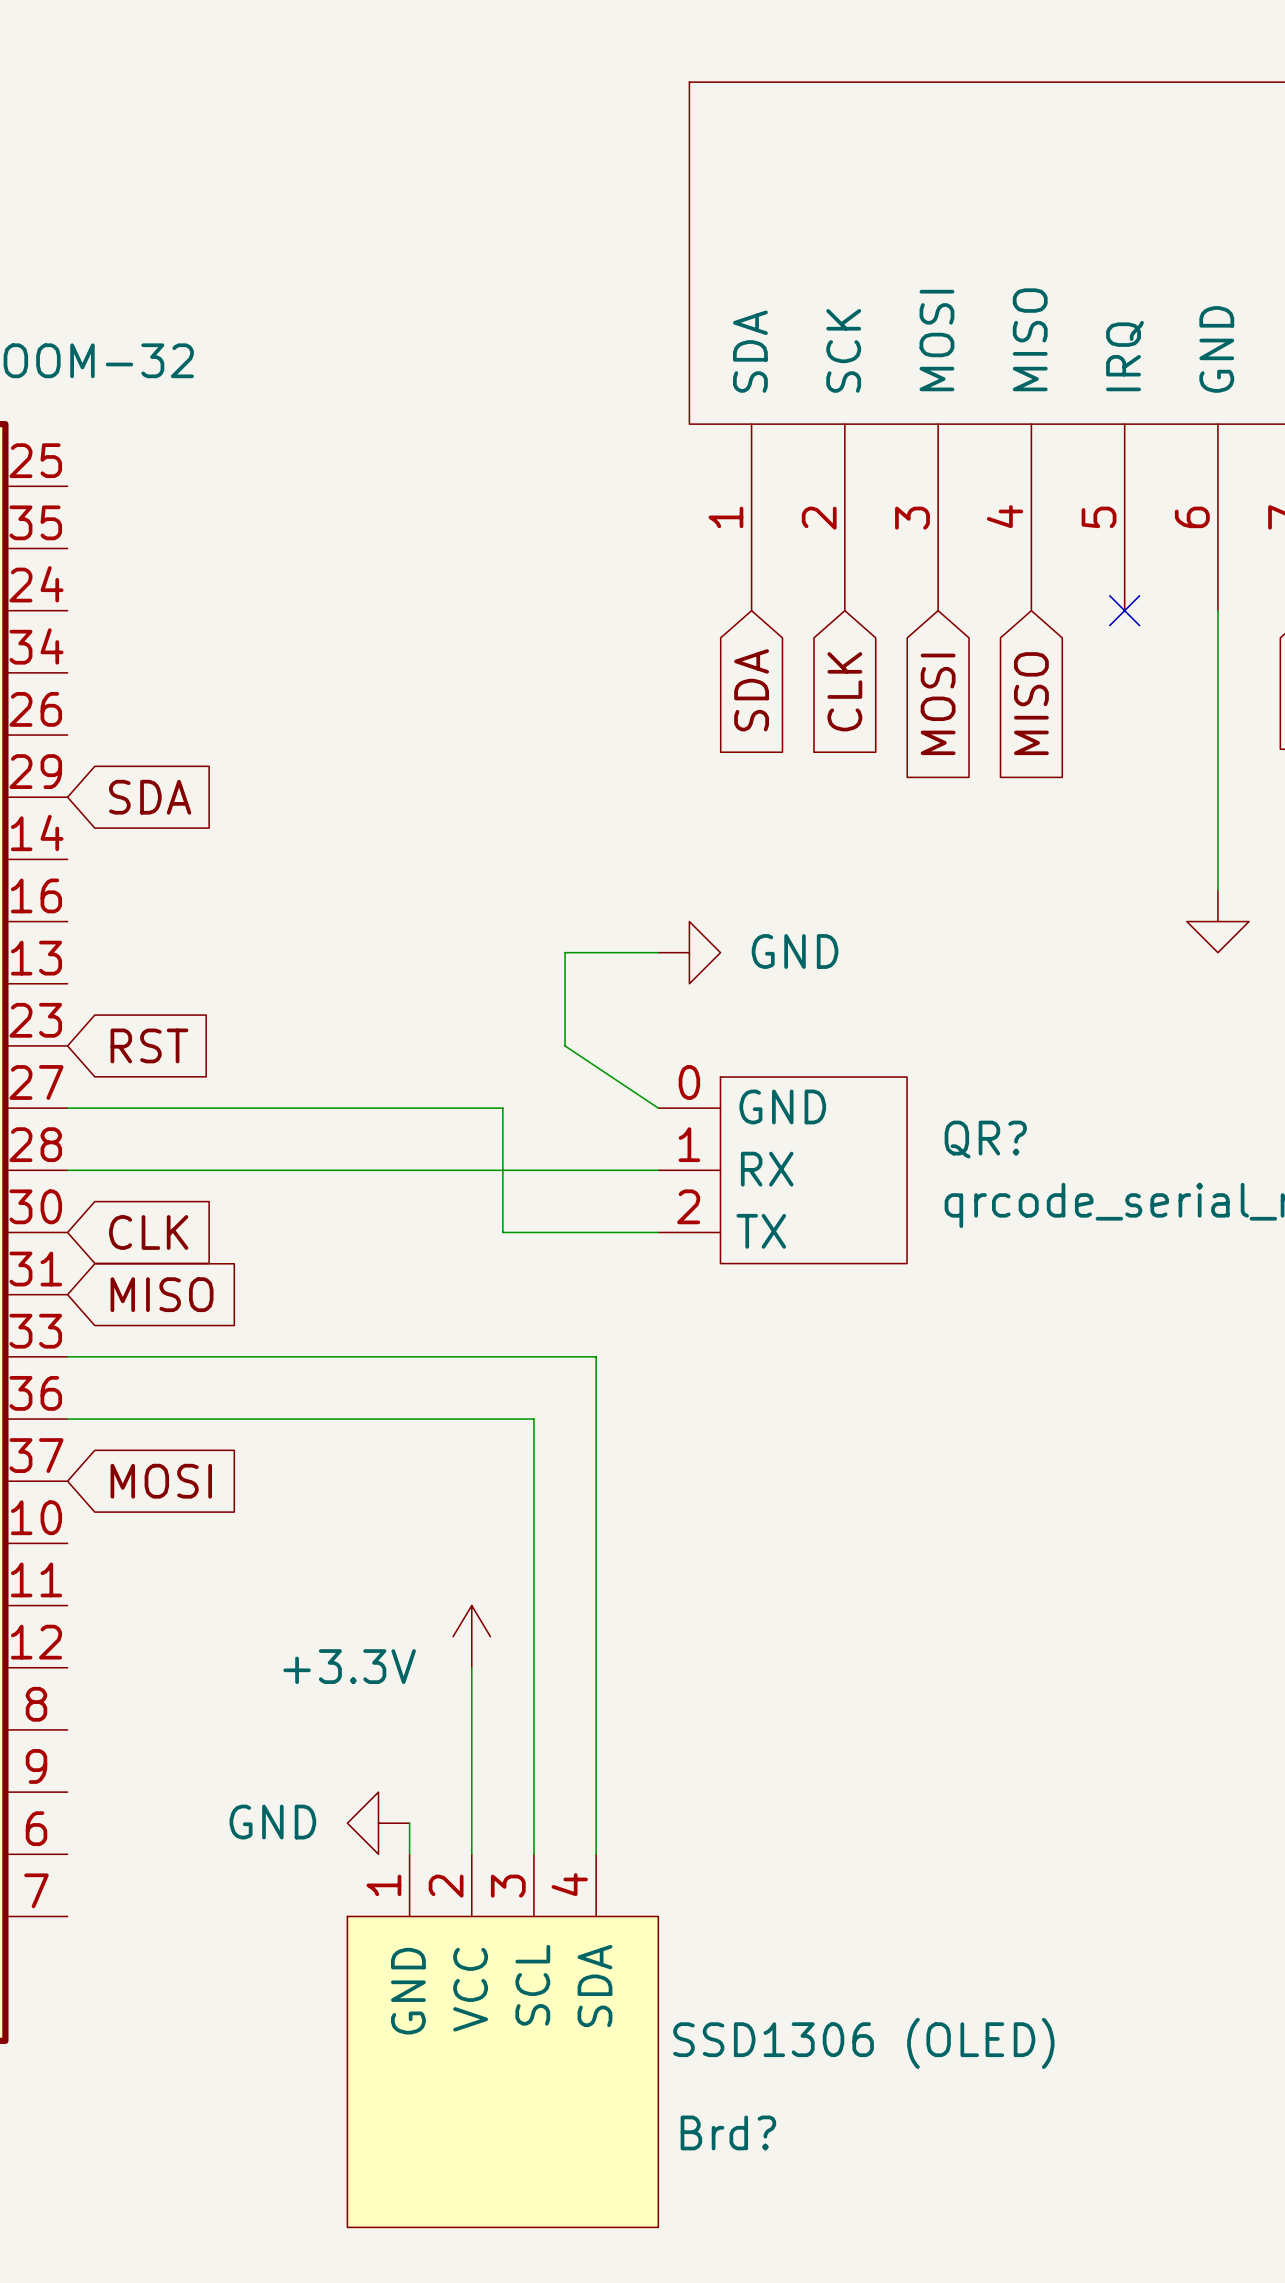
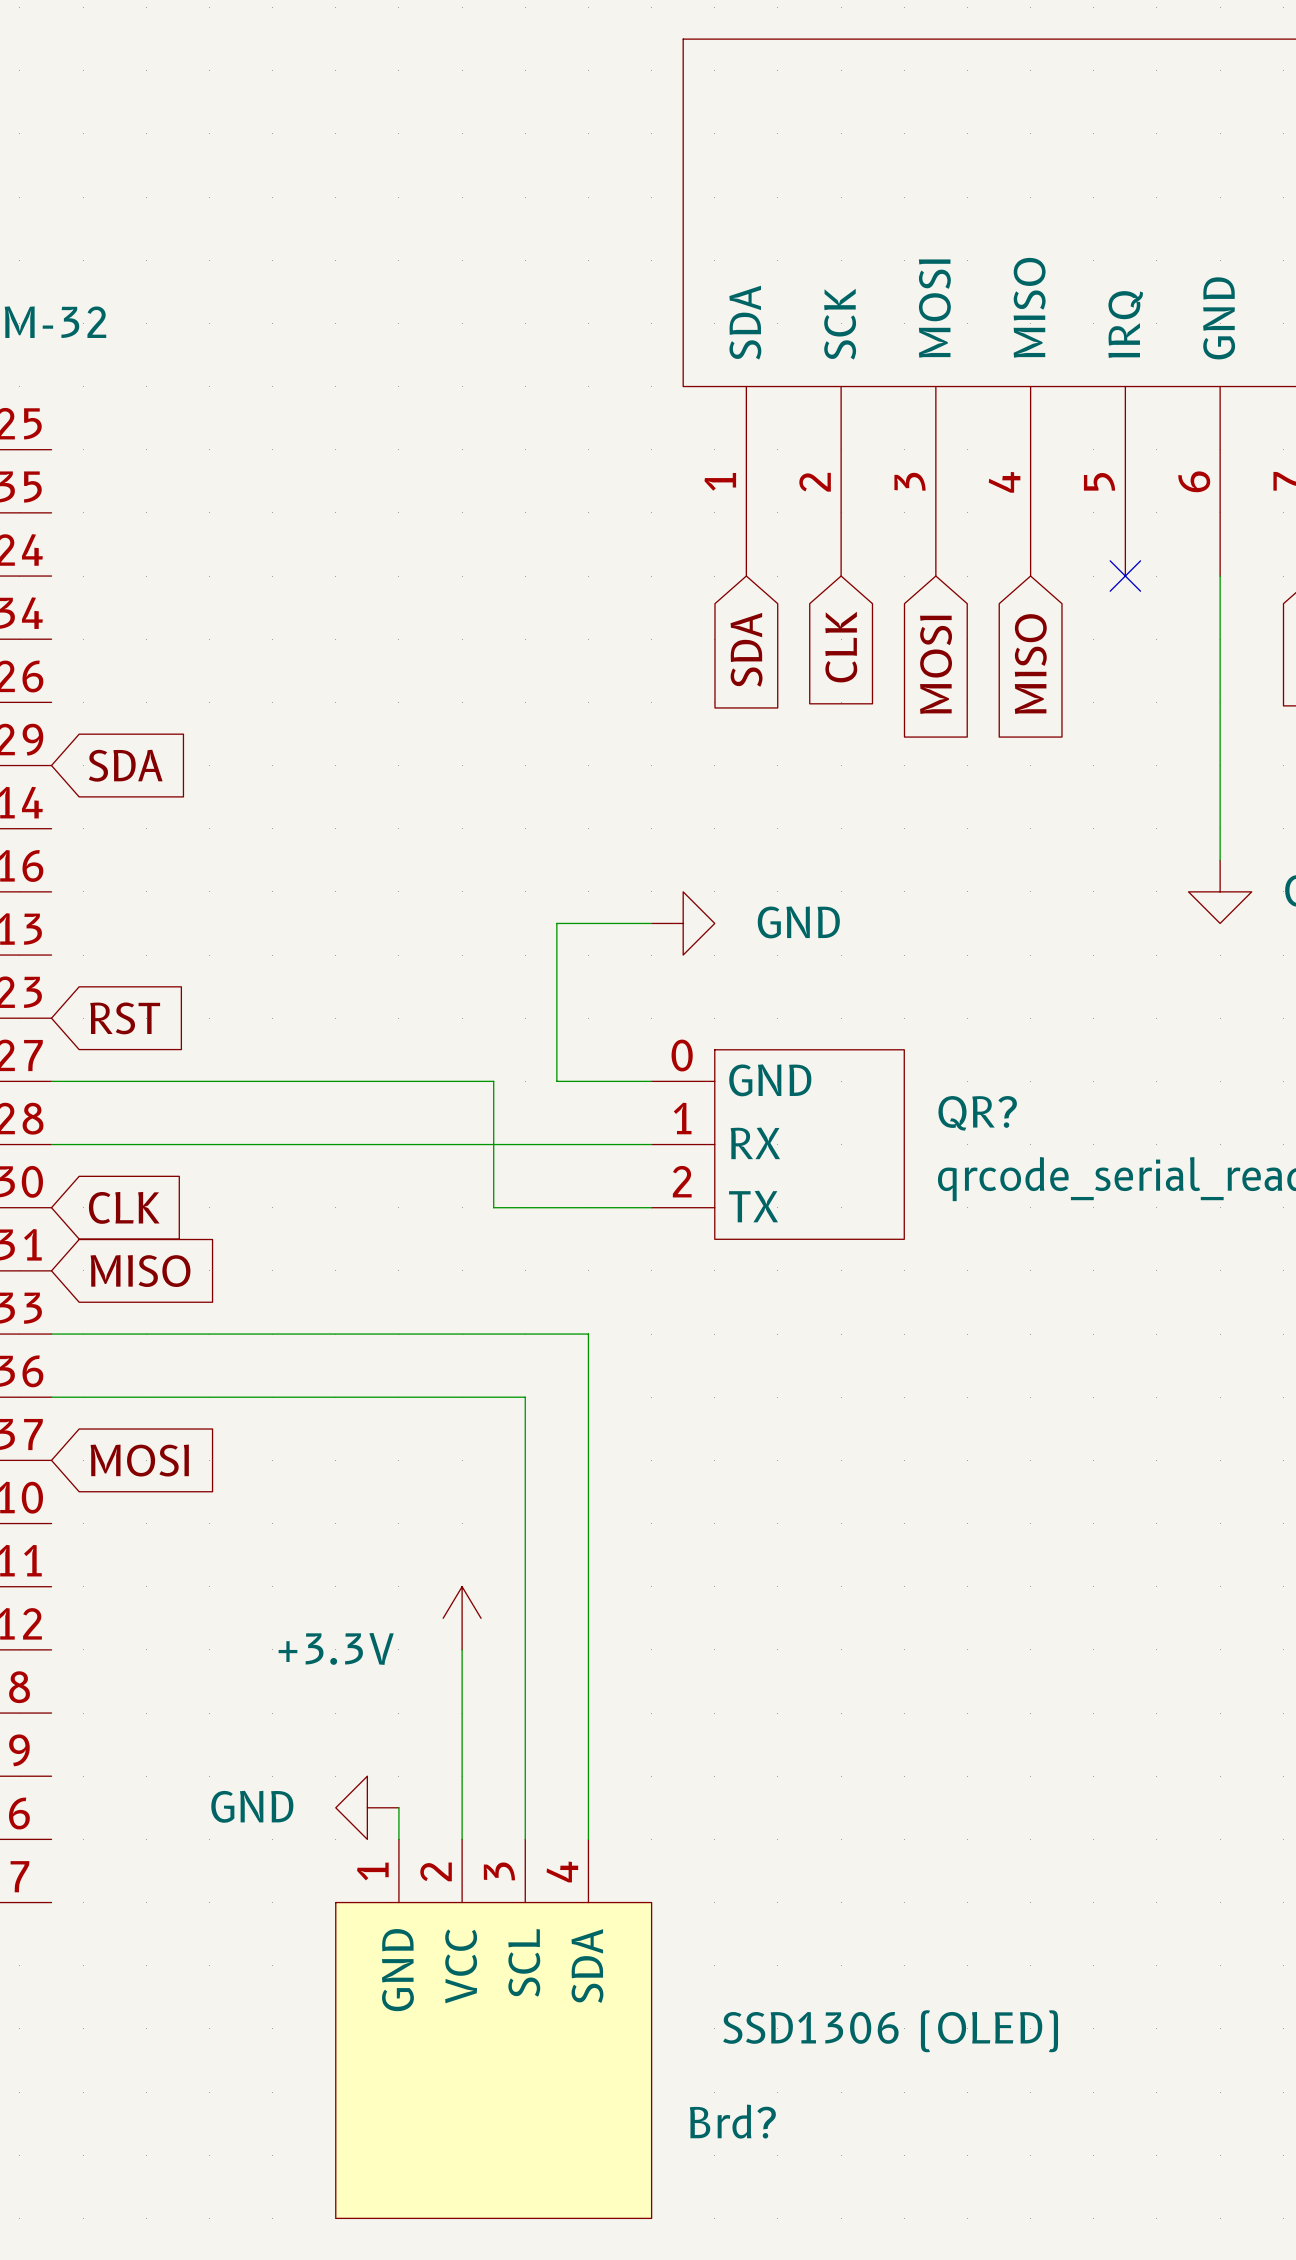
wire: (565, 1045) (658, 1108) -> (556, 1018) (556, 1081) (651, 1081)

